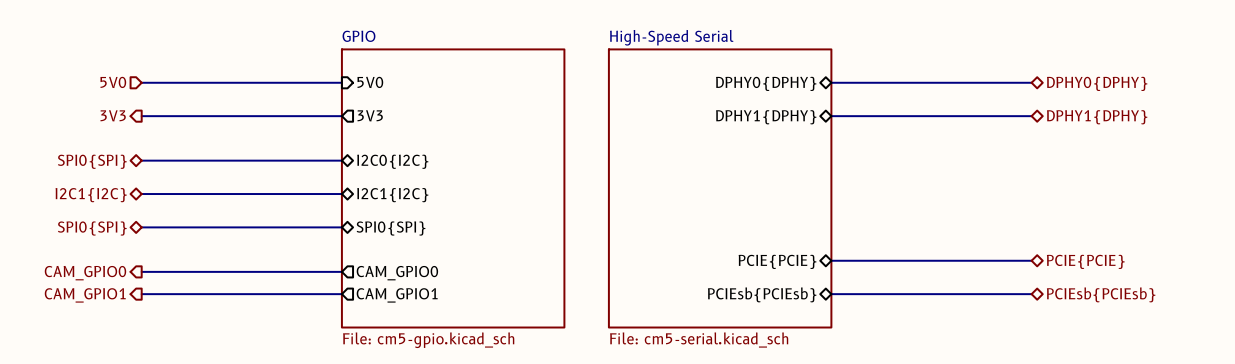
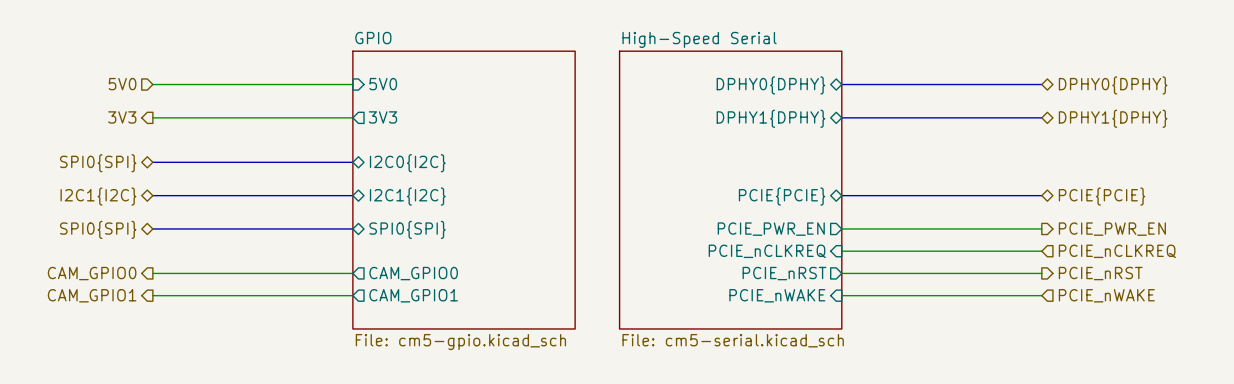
wire: none -> (841, 228) (1041, 228)
sheet pin: none -> PCIE_PWR_EN (771, 229)
hierarchical label: none -> PCIE_PWR_EN (1112, 229)
wire: none -> (841, 251) (1041, 251)
sheet pin: none -> PCIE_nCLKREQ (767, 251)
hierarchical label: none -> PCIE_nCLKREQ (1117, 251)
bus: (831, 260) (1031, 260) -> (841, 195) (1041, 195)
sheet pin position: PCIE{PCIE} (777, 261) -> PCIE{PCIE} (782, 196)
hierarchical label position: PCIE{PCIE} (1085, 261) -> PCIE{PCIE} (1102, 196)
wire: none -> (841, 273) (1041, 273)
sheet pin: none -> PCIE_nRST (784, 273)
hierarchical label: none -> PCIE_nRST (1100, 273)
sheet pin shape: bidirectional (762, 294) -> input (777, 295)
sheet pin: PCIEsb{PCIEsb} (762, 294) -> PCIE_nWAKE (777, 295)
bus: (831, 294) (1031, 294) -> none
hierarchical label shape: bidirectional (1101, 294) -> input (1106, 295)
hierarchical label: PCIEsb{PCIEsb} (1101, 294) -> PCIE_nWAKE (1106, 295)

